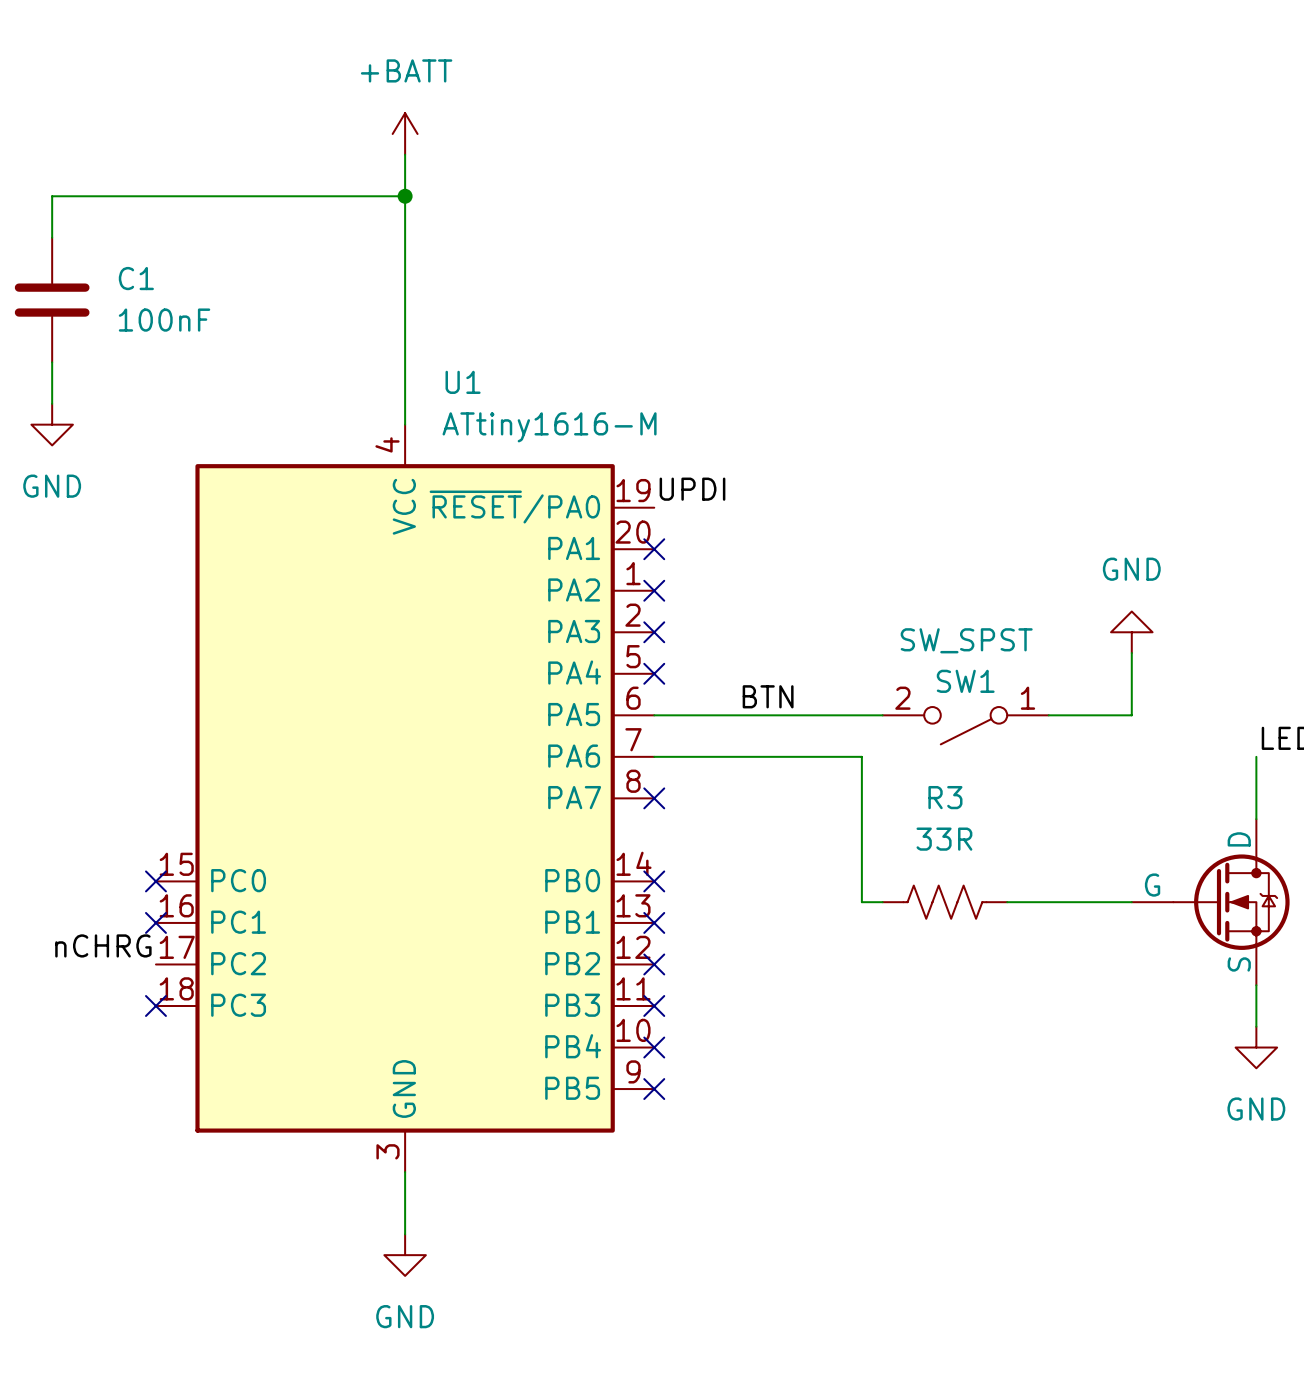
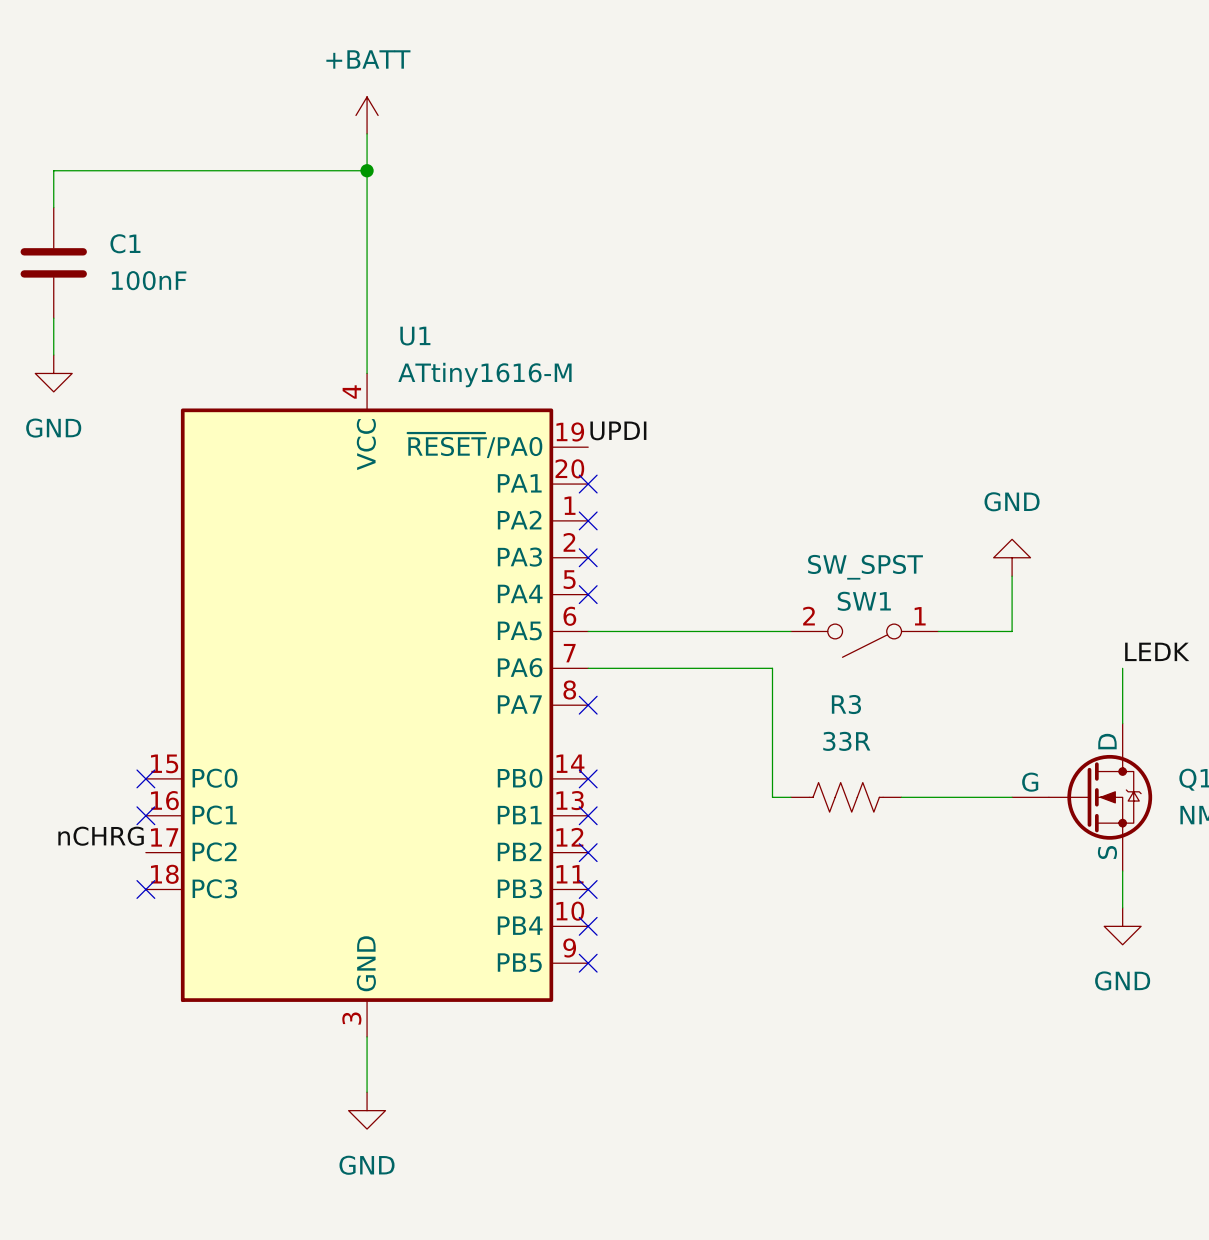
label: BTN (768, 696) -> none

